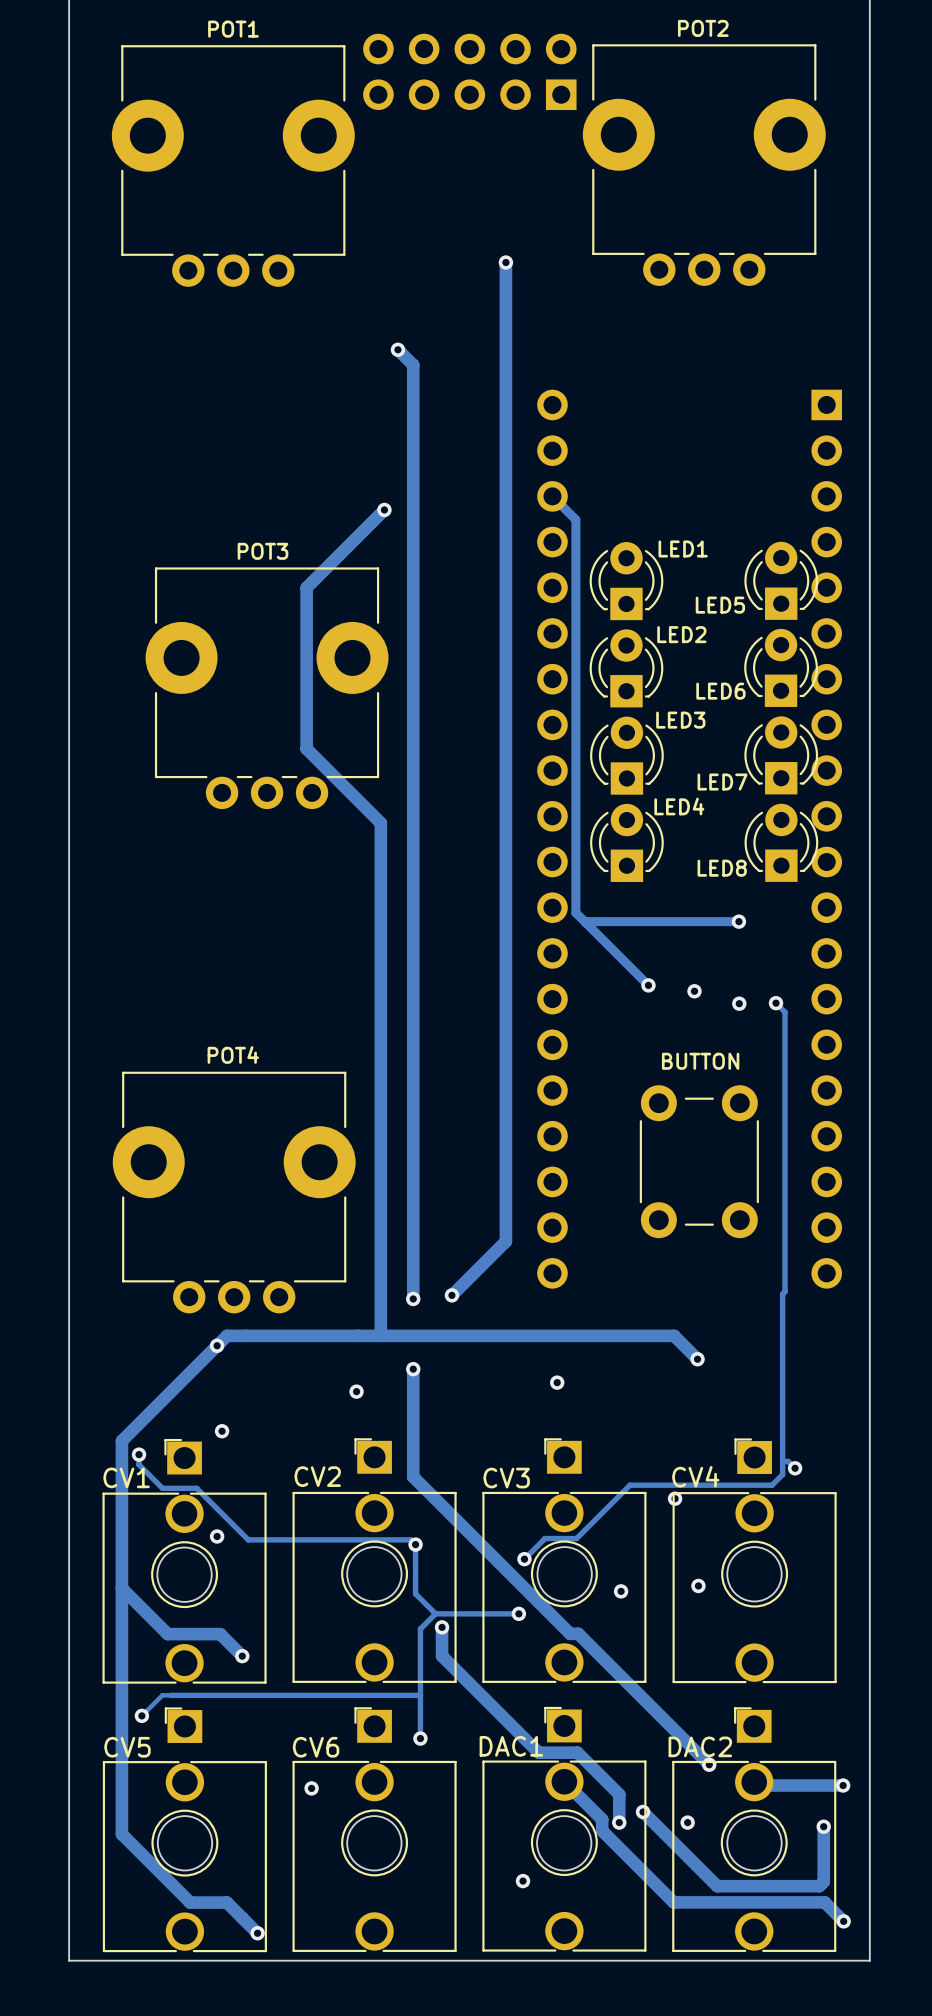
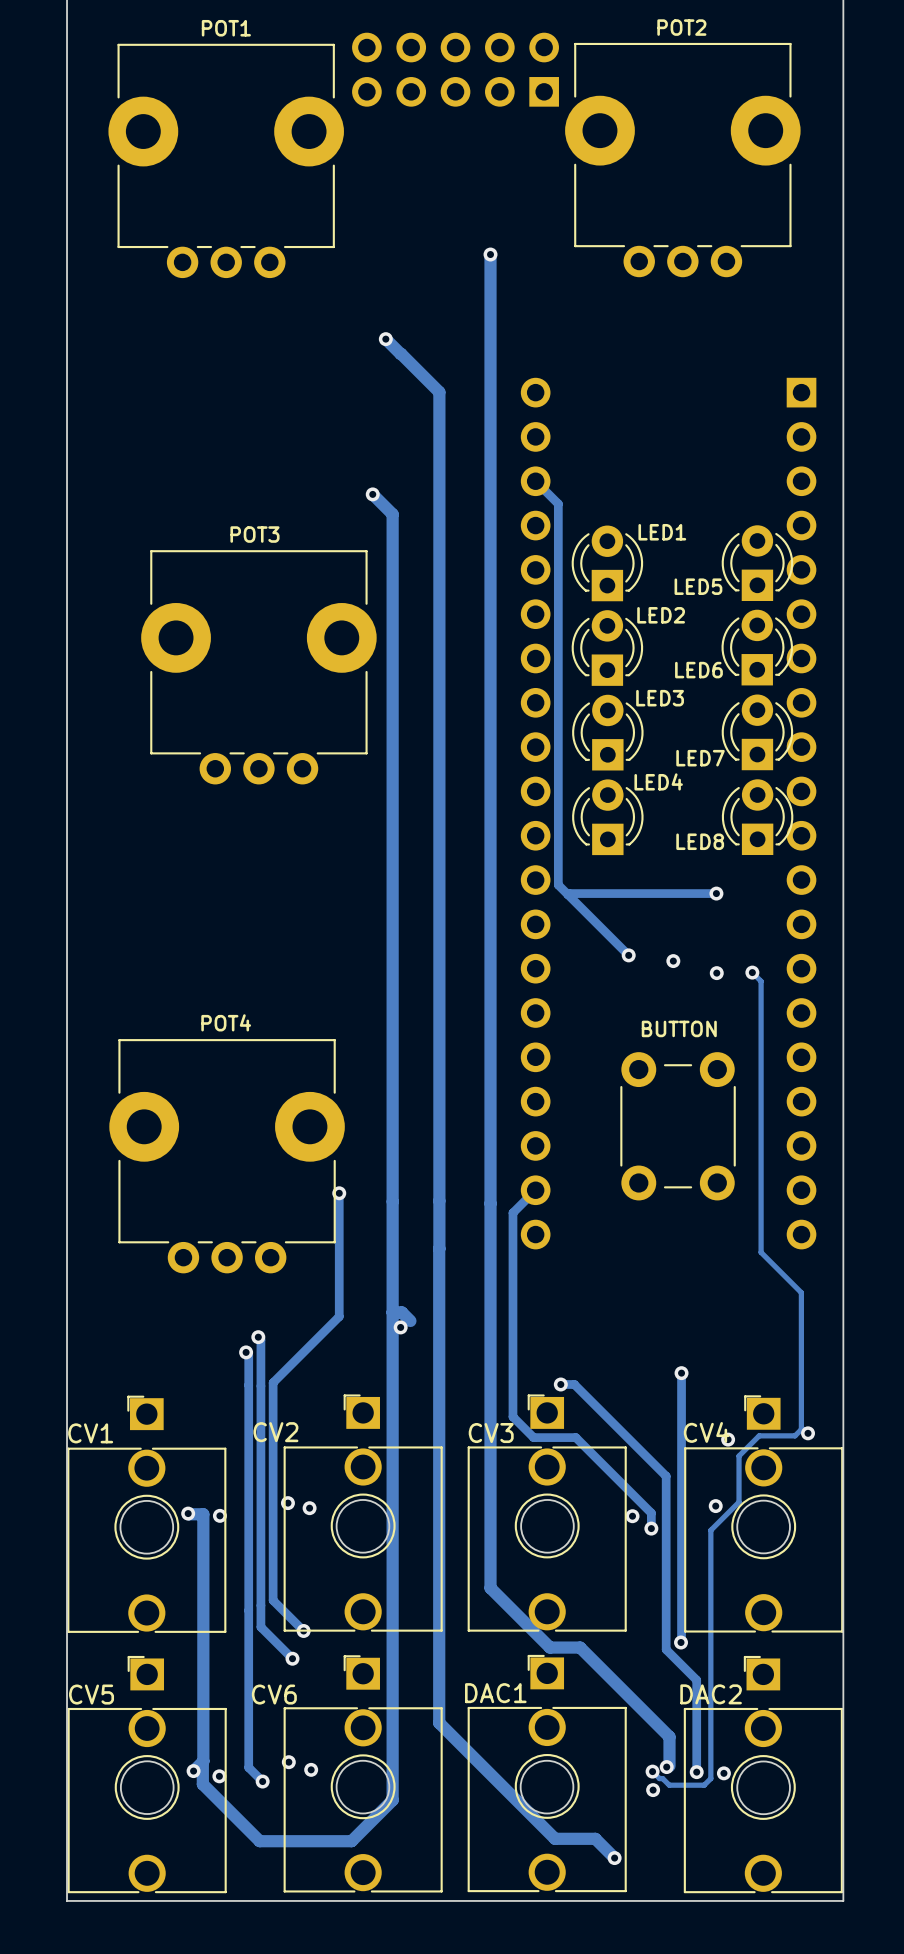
track: (413, 365) (413, 1298) -> (400, 353) (439, 392) (439, 1248)
track: (384, 509) (306, 587) (306, 748) (380, 823) (380, 1335) -> (372, 494) (392, 514) (392, 1800) (351, 1841) (259, 1841) (202, 1784) (202, 1761)
track: none -> (535, 1190) (512, 1212) (512, 1416) (533, 1437) (575, 1437) (651, 1513) (651, 1528)
track: none -> (339, 1193) (339, 1316) (273, 1382) (273, 1600) (303, 1630)
via: none -> (339, 1193)
track: (505, 1241) (451, 1295) -> (490, 1203) (490, 1588) (549, 1647) (580, 1647) (669, 1736) (669, 1766)
track: none -> (439, 1248) (439, 1722) (555, 1838) (595, 1838) (614, 1858)
track: (785, 1291) (782, 1294) (782, 1474) (772, 1485) (629, 1485) (576, 1538) (545, 1538) (524, 1559) -> (761, 1252) (801, 1292) (801, 1429)
via: (451, 1295) -> none
via: (413, 1298) -> none
via: (217, 1345) -> none
track: none -> (392, 1312) (401, 1312) (410, 1320)
track: (697, 1359) (674, 1335) (227, 1335) (121, 1440) (121, 1834) (190, 1902) (226, 1902) (257, 1933) -> none
via: (697, 1359) -> none
track: (413, 1369) (413, 1476) (570, 1633) (578, 1633) (709, 1764) -> none
track: none -> (258, 1337) (260, 1339) (260, 1627) (292, 1658)
via: none -> (258, 1337)
via position: (557, 1382) -> (560, 1384)
via: (356, 1391) -> none
track: none -> (246, 1352) (248, 1355) (248, 1767) (262, 1781)
via: none -> (246, 1352)
track: none -> (681, 1373) (681, 1642)
via: none -> (681, 1373)
track: none -> (560, 1384) (574, 1384) (666, 1476) (666, 1649) (696, 1680) (696, 1772)
via: (222, 1431) -> none
track: (139, 1454) (139, 1464) (162, 1488) (196, 1488) (248, 1539) (410, 1539) (415, 1544) (415, 1593) (435, 1613) -> none
via: (139, 1454) -> none
via: (795, 1468) -> none
track: none -> (801, 1429) (795, 1435) (759, 1435) (739, 1456) (739, 1502) (710, 1530) (710, 1778) (704, 1785) (669, 1785) (652, 1771)
text position: CV2 (317, 1476) -> CV2 (275, 1432)
text position: CV4 (695, 1476) -> CV4 (706, 1432)
text position: CV1 (126, 1477) -> CV1 (90, 1433)
via: none -> (808, 1433)
via: none -> (728, 1439)
via: (675, 1498) -> none
via: (217, 1536) -> none
via: (415, 1544) -> none
via: none -> (287, 1503)
via: none -> (715, 1506)
via: none -> (309, 1508)
via: (524, 1559) -> none
part position: (754, 1560) -> (763, 1513)
part position: (184, 1561) -> (146, 1514)
track: none -> (188, 1513) (203, 1514) (203, 1761) (193, 1771)
via: none -> (188, 1513)
via: none -> (219, 1515)
via: none -> (632, 1516)
round board edge position: (184, 1574) -> (146, 1527)
round board edge position: (754, 1574) -> (763, 1527)
via: none -> (651, 1528)
via: (698, 1585) -> none
track: (121, 1588) (167, 1634) (220, 1634) (242, 1656) -> none
via: (621, 1591) -> none
track: (435, 1613) (420, 1628) (420, 1738) -> none
track: (518, 1613) (435, 1613) -> none
via: (518, 1613) -> none
track: (442, 1627) (442, 1656) (538, 1752) (577, 1752) (619, 1794) (619, 1822) -> none
via: (442, 1627) -> none
via: (242, 1656) -> none
via: none -> (303, 1630)
via: none -> (681, 1642)
track: (420, 1695) (162, 1695) (141, 1715) -> none
via: none -> (292, 1658)
via: (141, 1715) -> none
via: (420, 1738) -> none
text position: DAC2 (700, 1746) -> DAC2 (711, 1694)
text position: CV5 (127, 1747) -> CV5 (91, 1694)
text position: CV6 (316, 1747) -> CV6 (274, 1694)
via: (709, 1764) -> none
track: (564, 1781) (602, 1819) (602, 1830) (673, 1902) (824, 1902) (843, 1921) -> none
track: (754, 1782) (757, 1785) (843, 1785) -> none
via: (843, 1785) -> none
via: (311, 1788) -> none
track: (643, 1811) (717, 1886) (819, 1886) (823, 1881) (823, 1826) -> none
via: (643, 1811) -> none
via: none -> (288, 1762)
via: (619, 1822) -> none
via: none -> (311, 1769)
via: none -> (193, 1771)
via: (823, 1826) -> none
via: none -> (652, 1771)
via: none -> (696, 1772)
part position: (184, 1829) -> (147, 1774)
via: none -> (723, 1773)
part position: (754, 1829) -> (763, 1774)
via: none -> (219, 1776)
via: none -> (262, 1781)
round board edge position: (184, 1843) -> (147, 1787)
round board edge position: (754, 1843) -> (763, 1787)
via: none -> (653, 1790)
via: (523, 1881) -> none
via: none -> (614, 1858)
via: (843, 1921) -> none
via: (257, 1933) -> none

